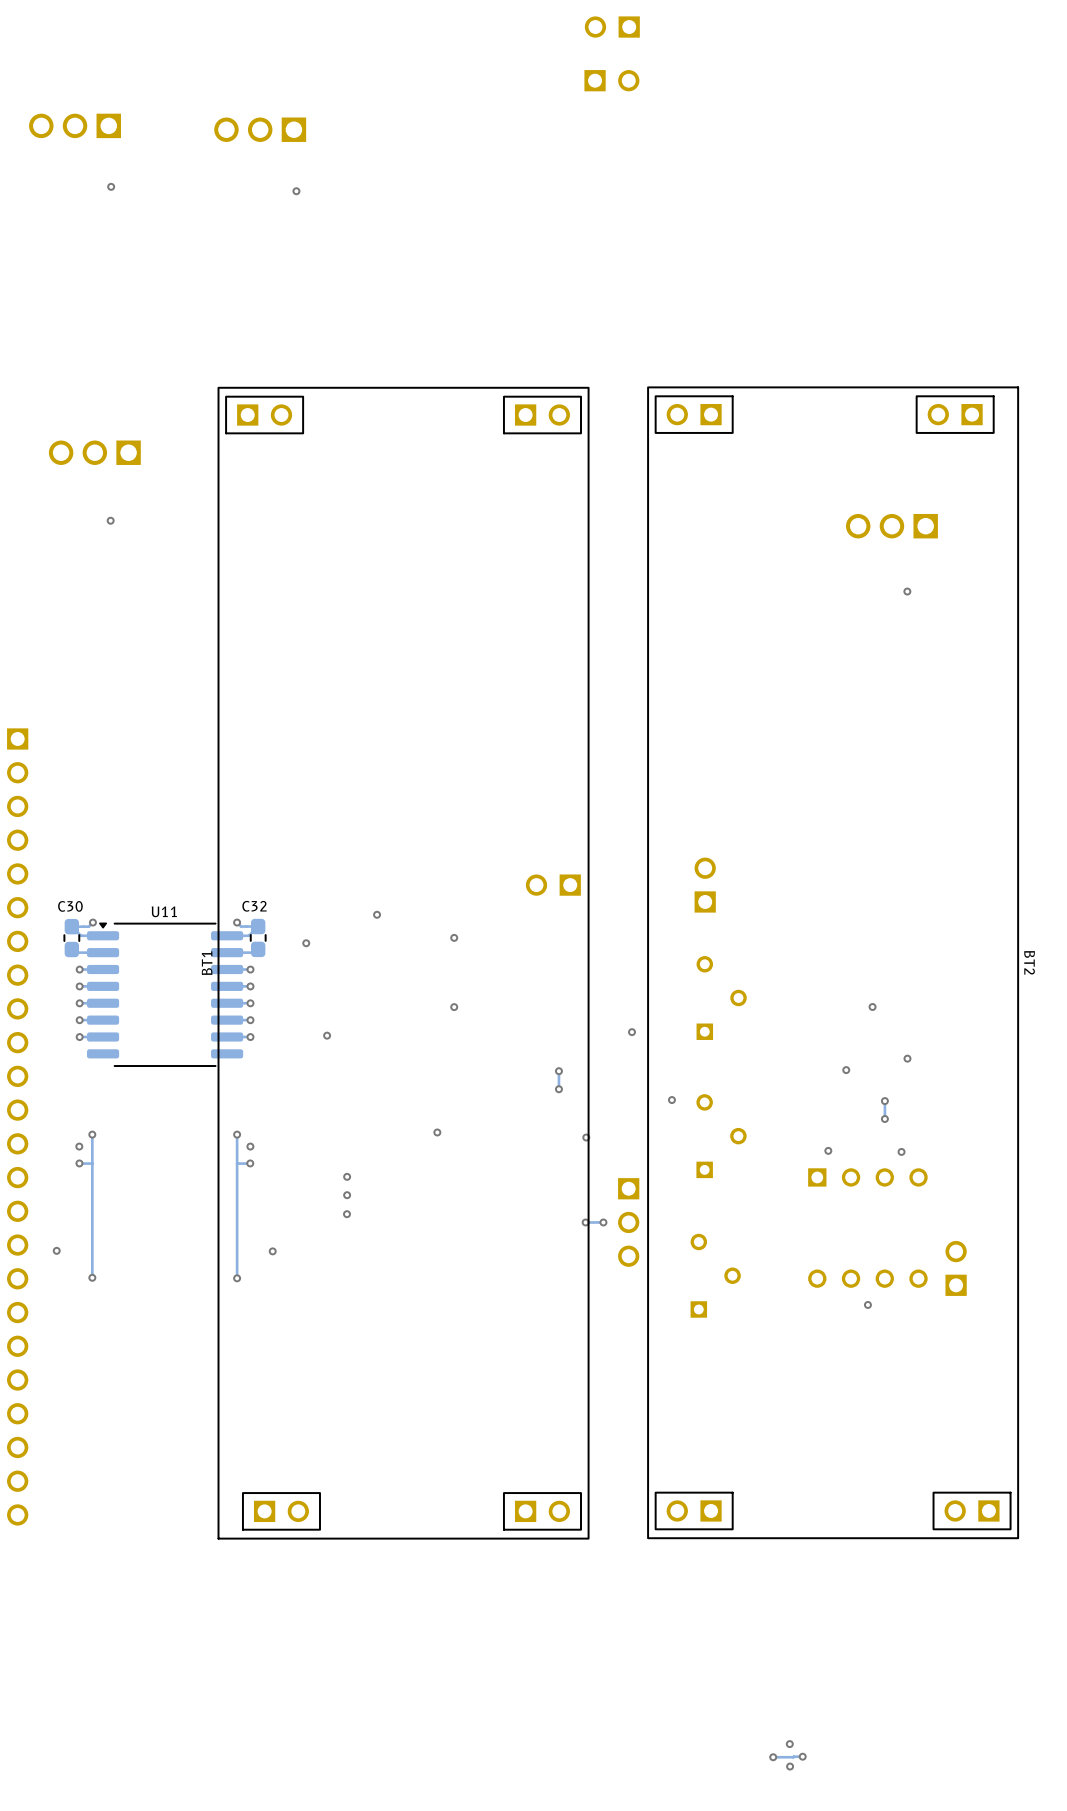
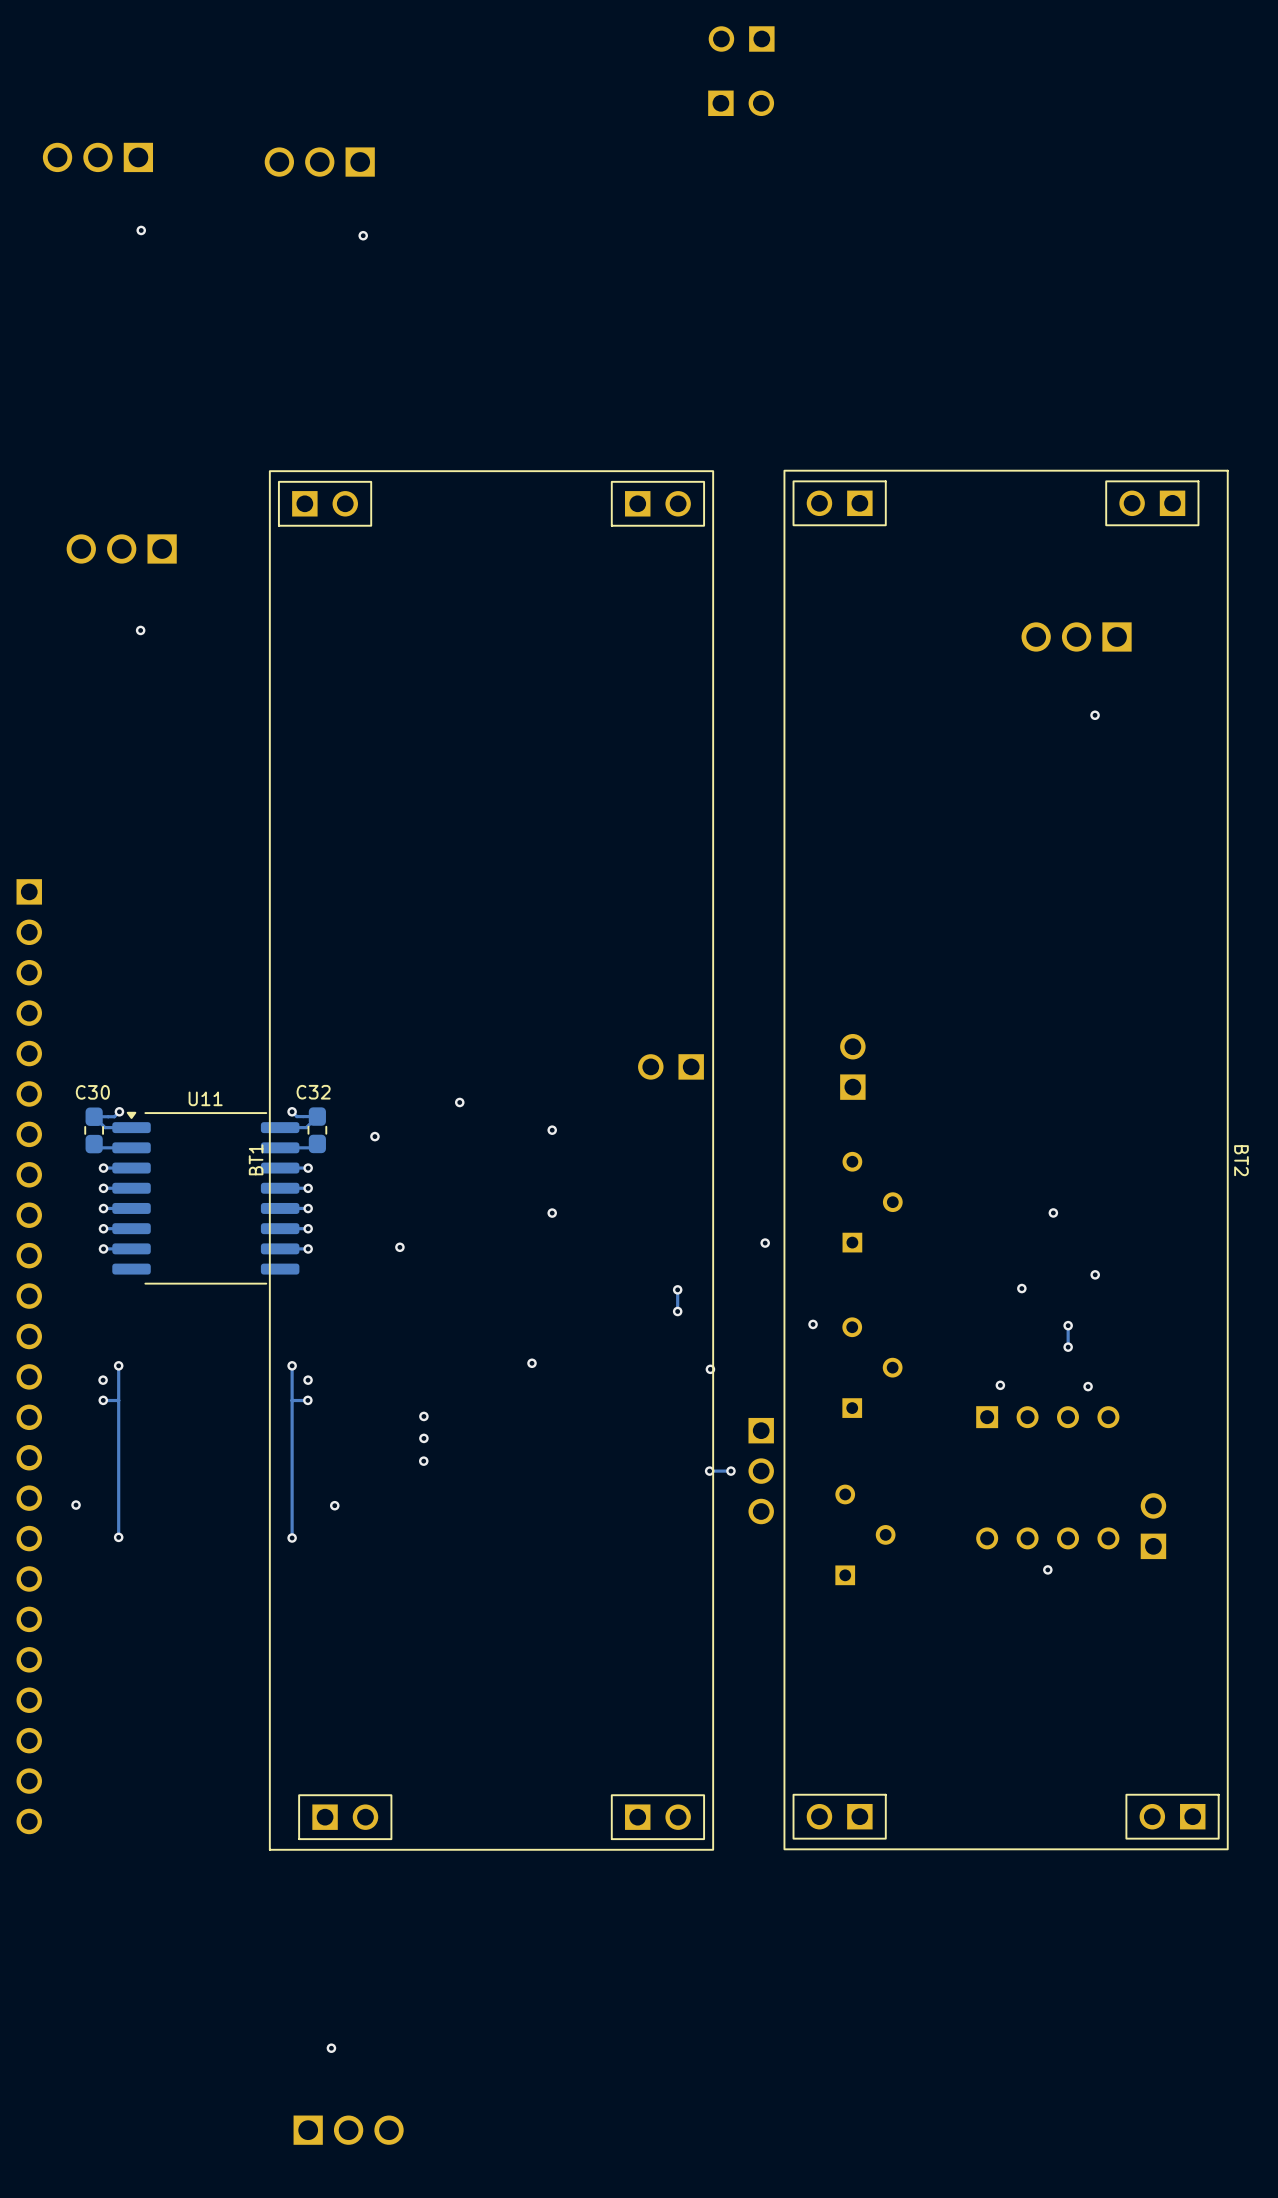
via: none -> (331, 2048)
via: (789, 1744) -> none
track: (802, 1756) (773, 1757) -> none
via: (802, 1756) -> none
via: (773, 1757) -> none
via: (790, 1766) -> none
part: none -> (348, 2130)

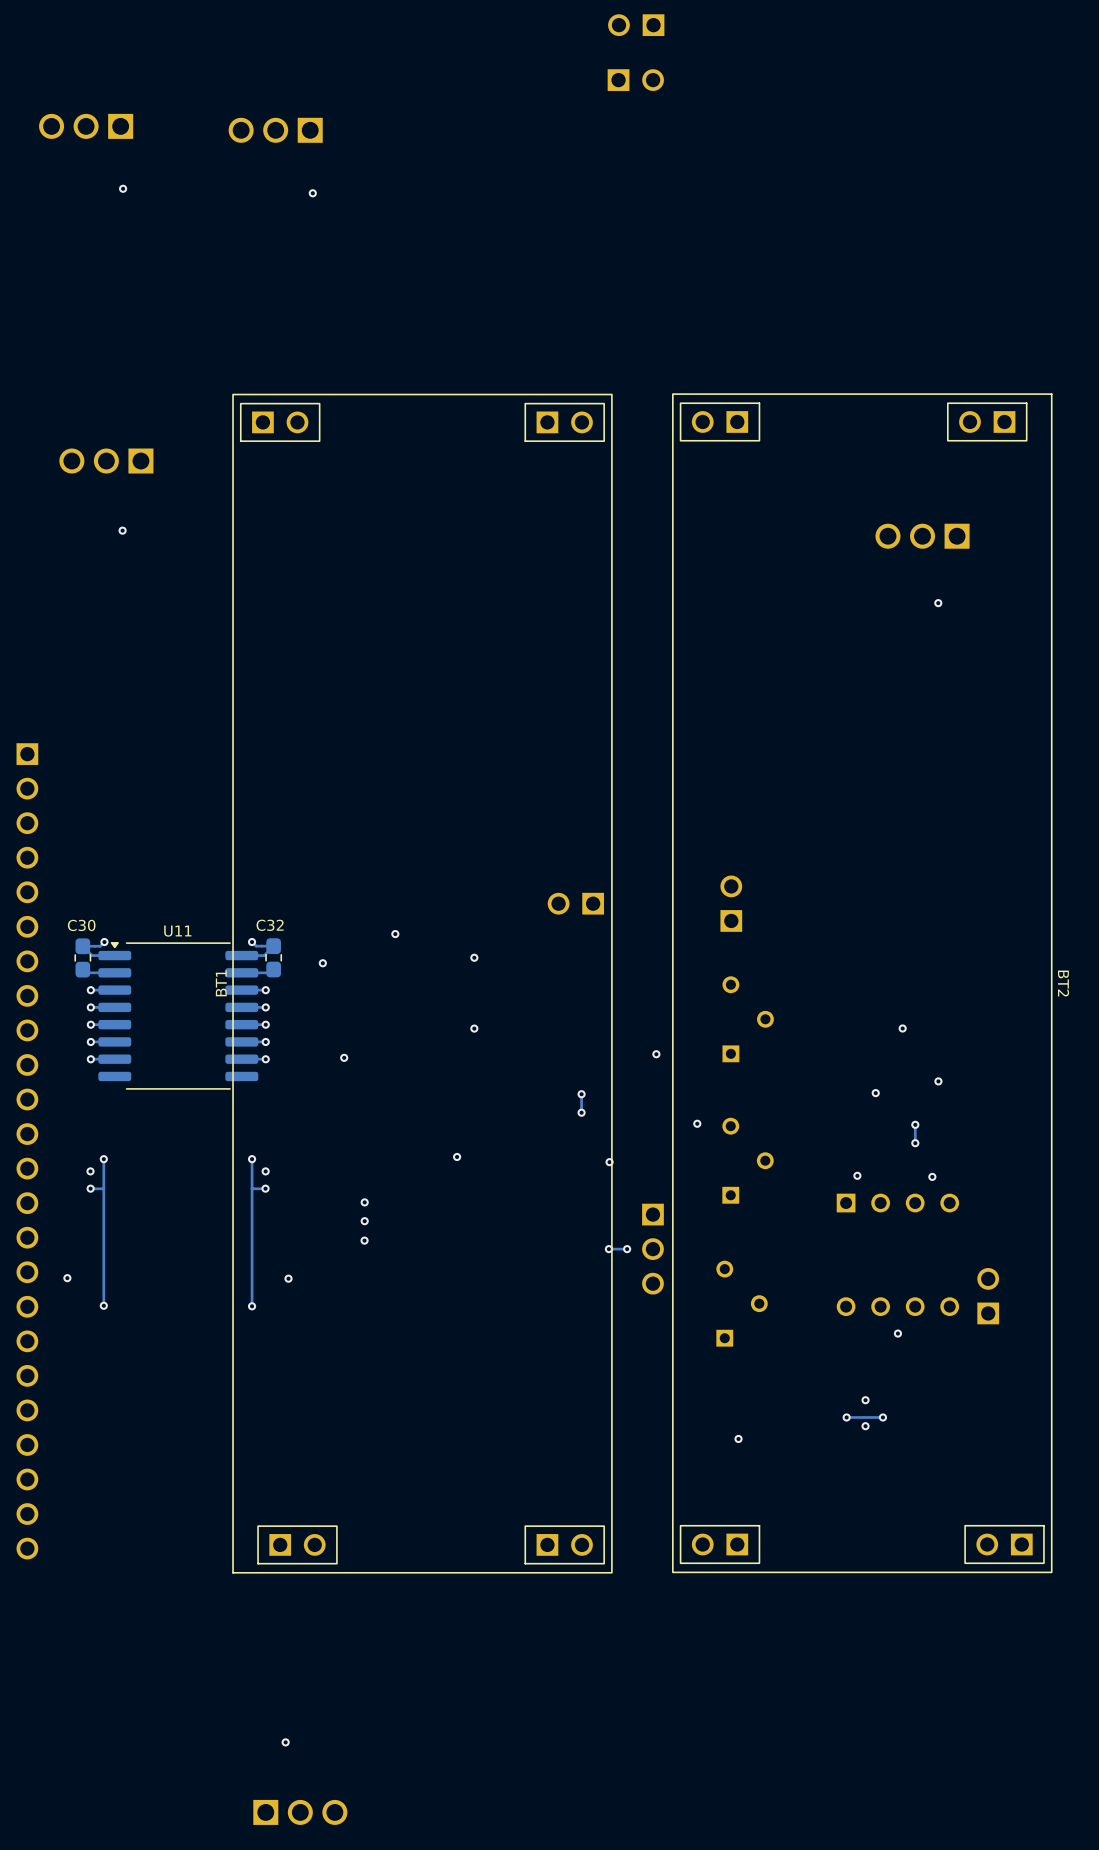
via: none -> (865, 1400)
via: none -> (846, 1417)
track: none -> (882, 1417) (846, 1417)
via: none -> (882, 1417)
via: none -> (865, 1426)
via: none -> (738, 1438)

